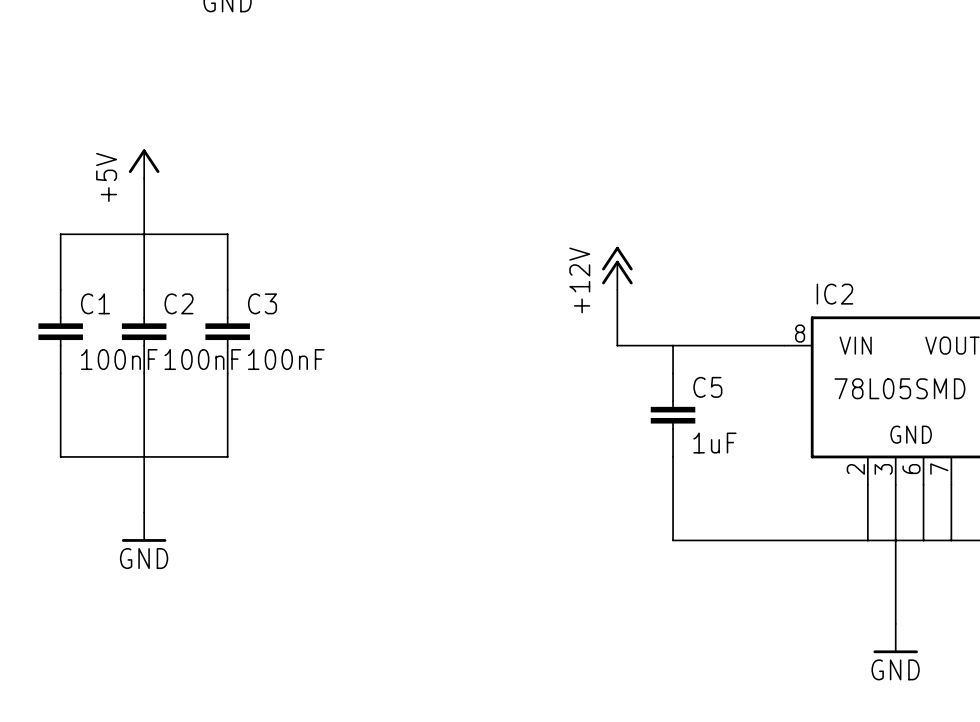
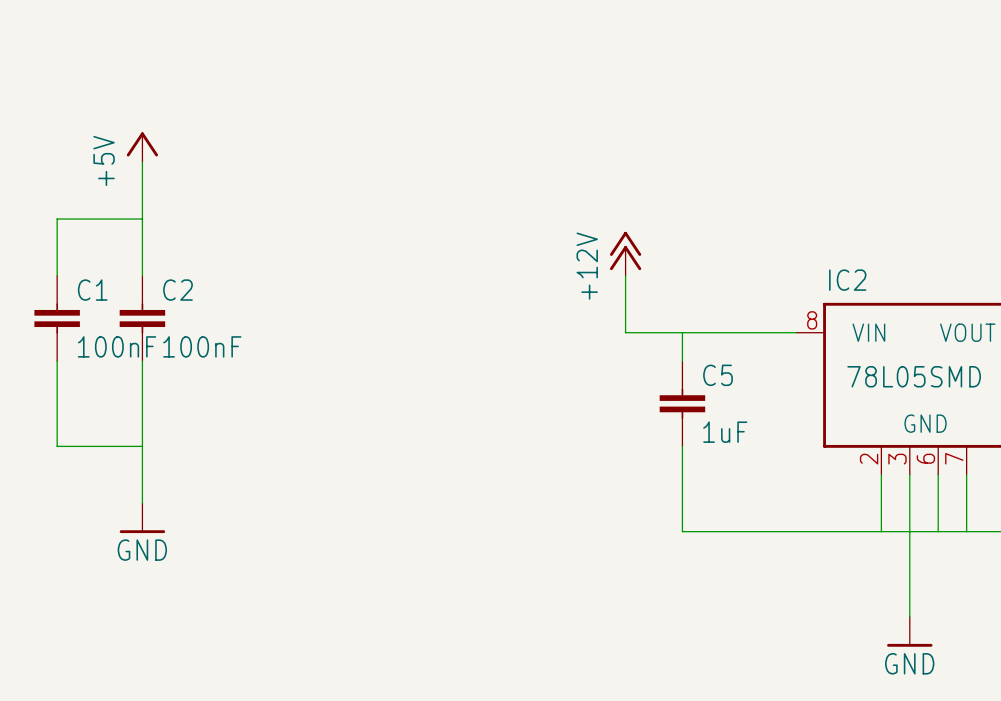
wire: (144, 234) (227, 234) (227, 289) -> none
C3: 100nF (227, 331) -> none
wire: (227, 373) (227, 456) (144, 456) -> none

